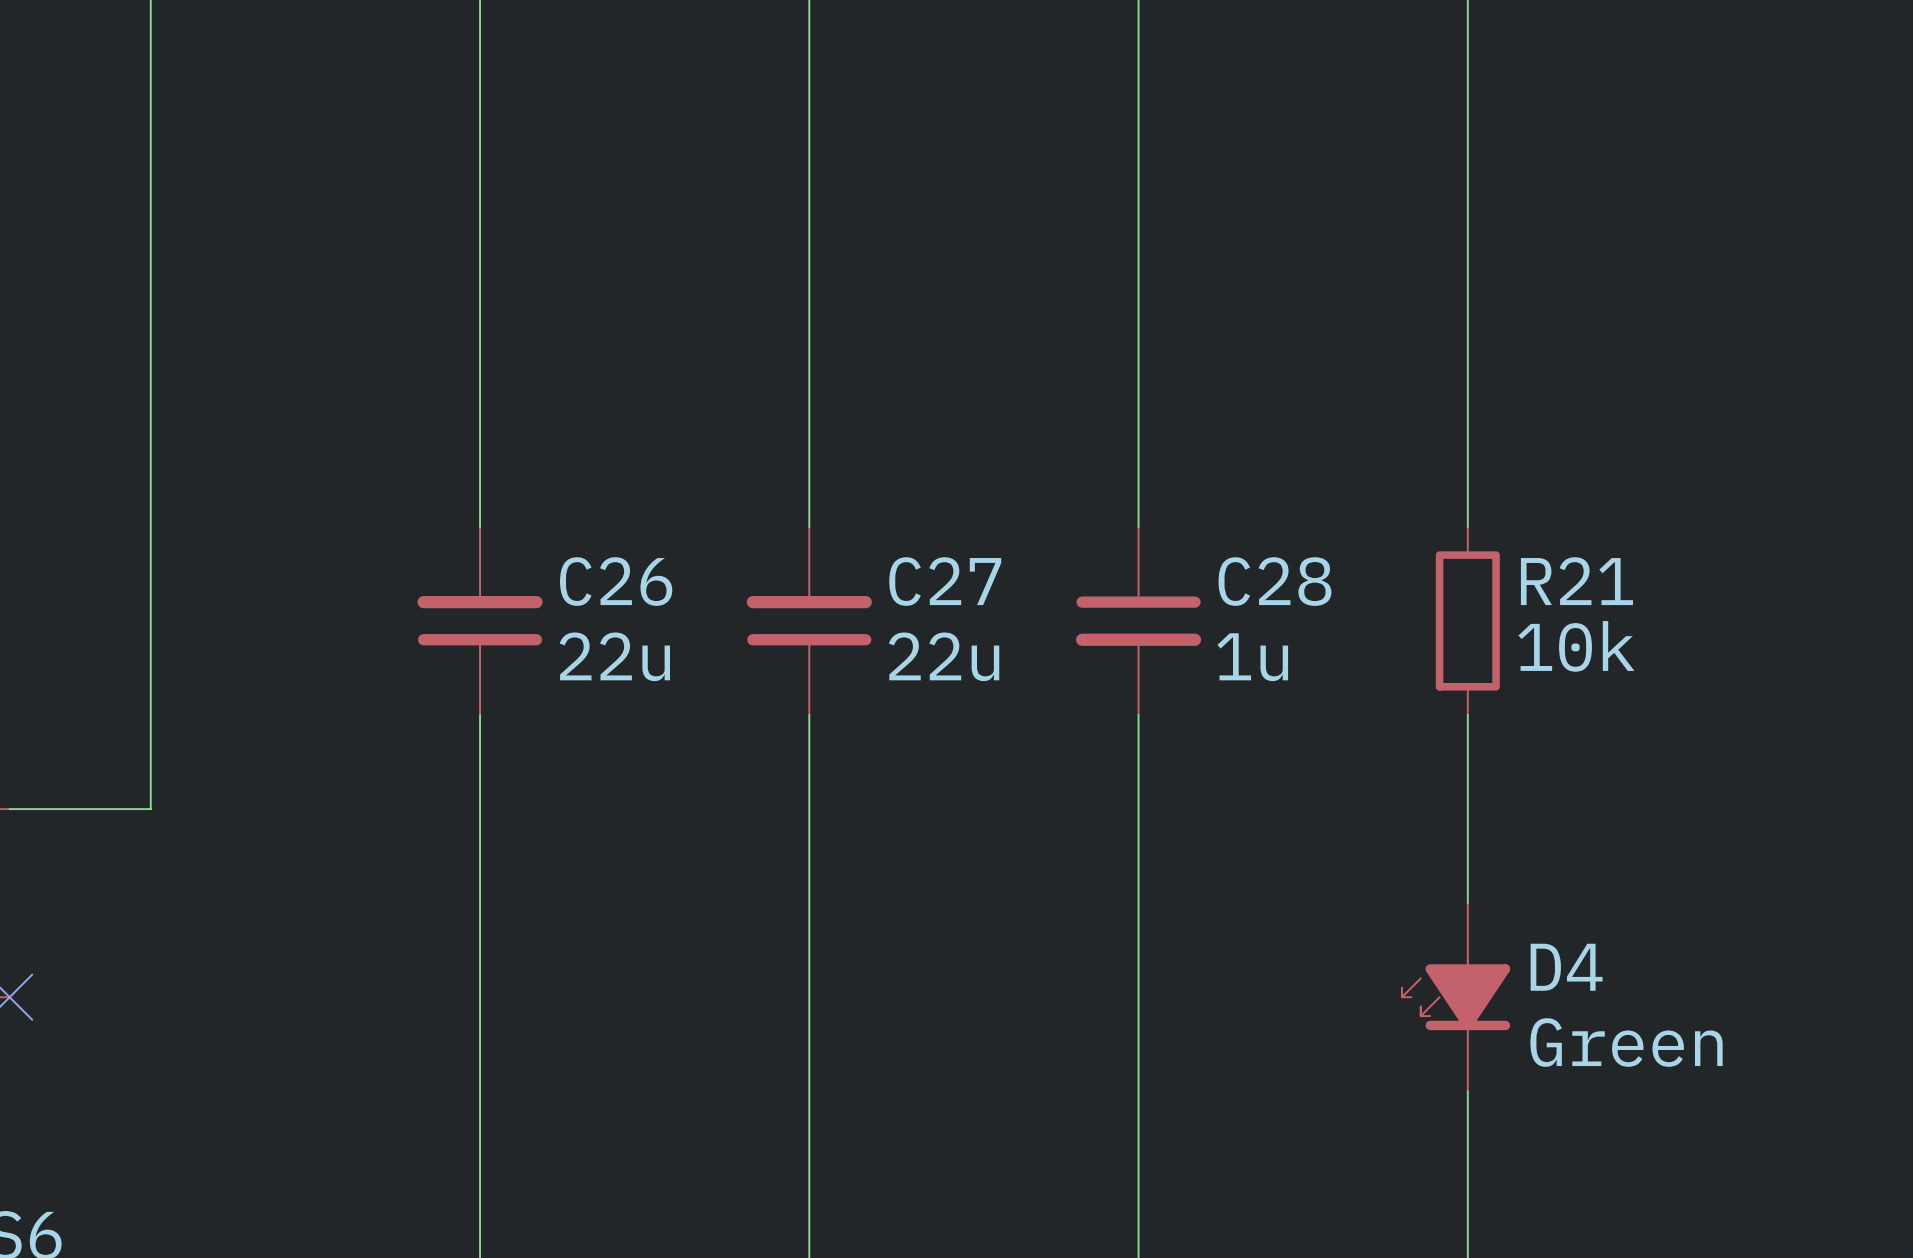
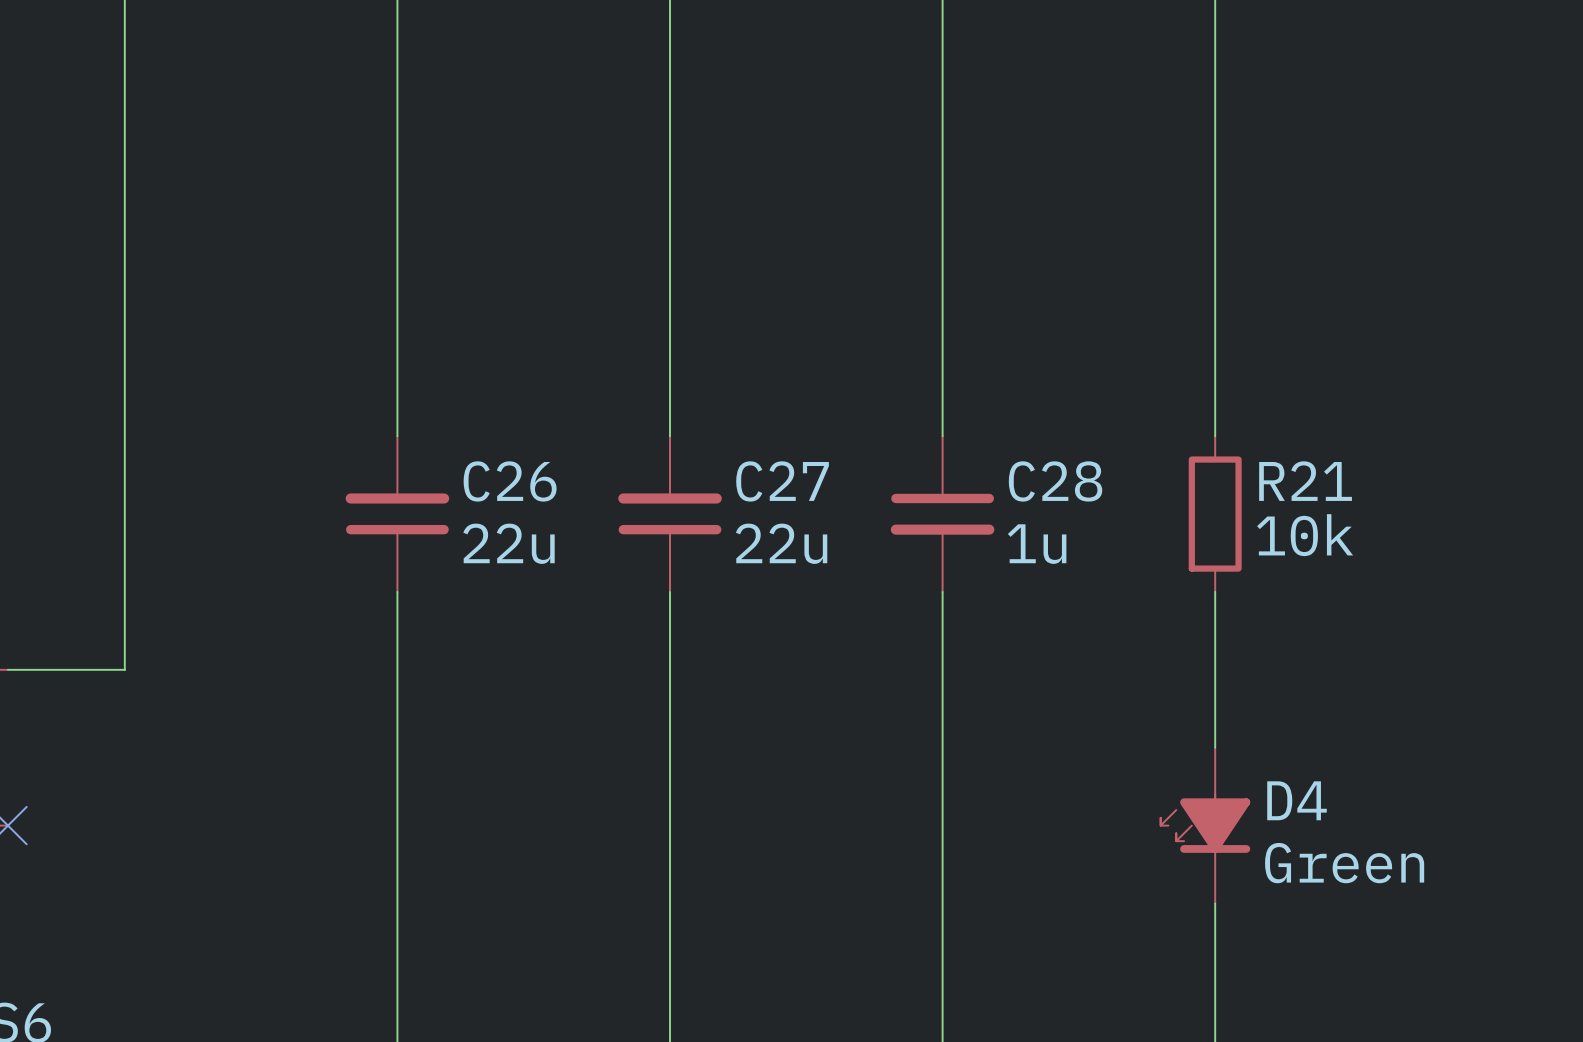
D4 text position: Green (1626, 1042) -> Green (1344, 863)

